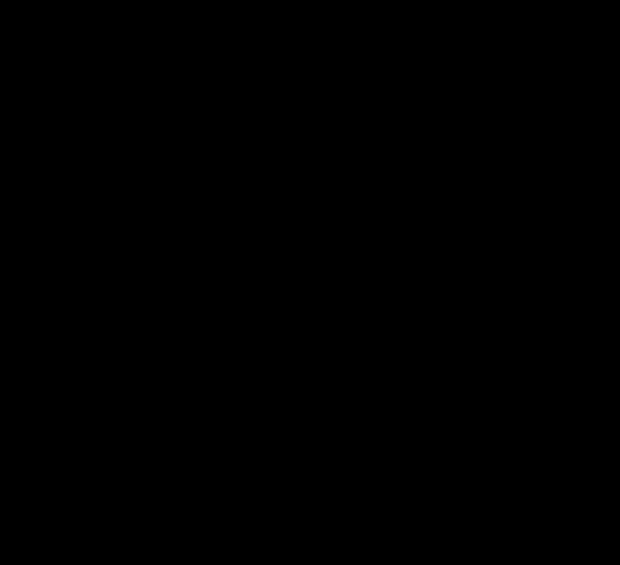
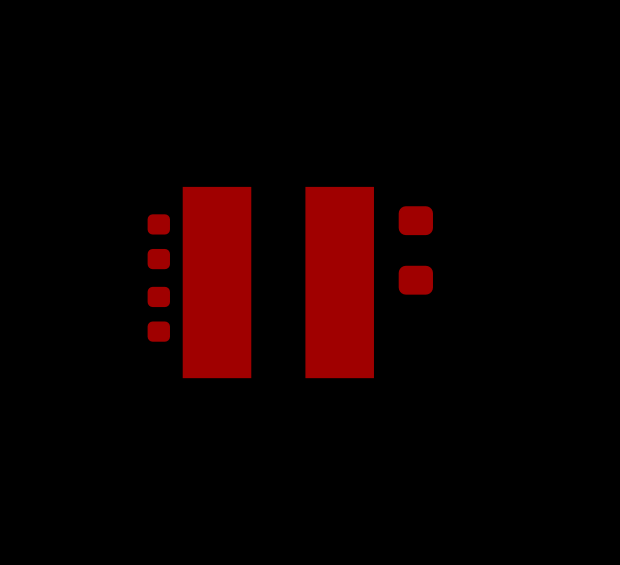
part: none -> (158, 241)
part: none -> (415, 250)
part: none -> (278, 282)
part: none -> (158, 314)

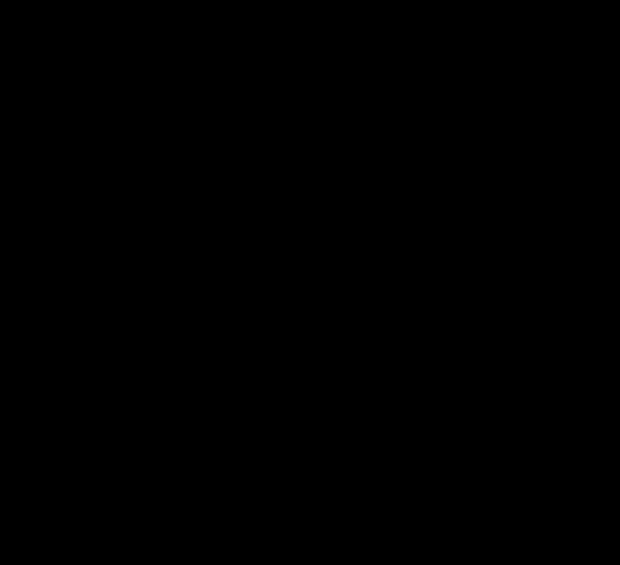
part: (158, 241) -> none
part: (415, 250) -> none
part: (278, 282) -> none
part: (158, 314) -> none

